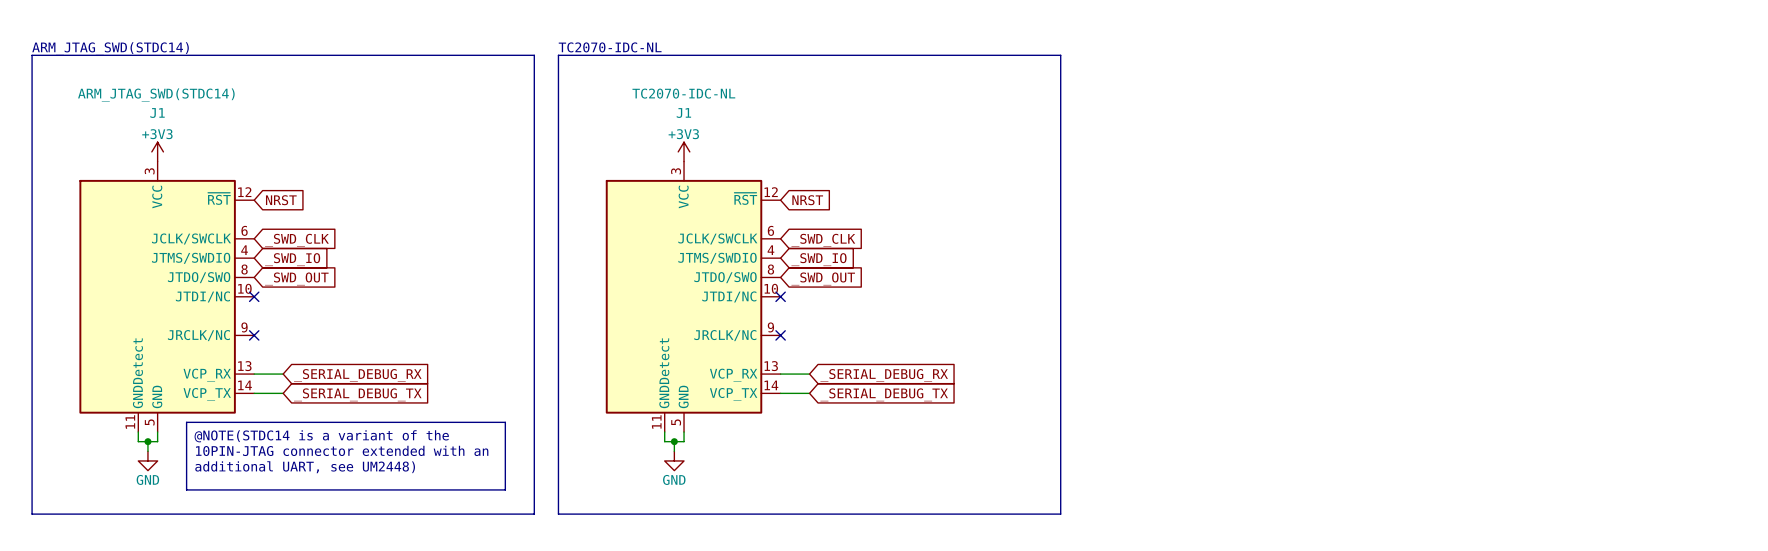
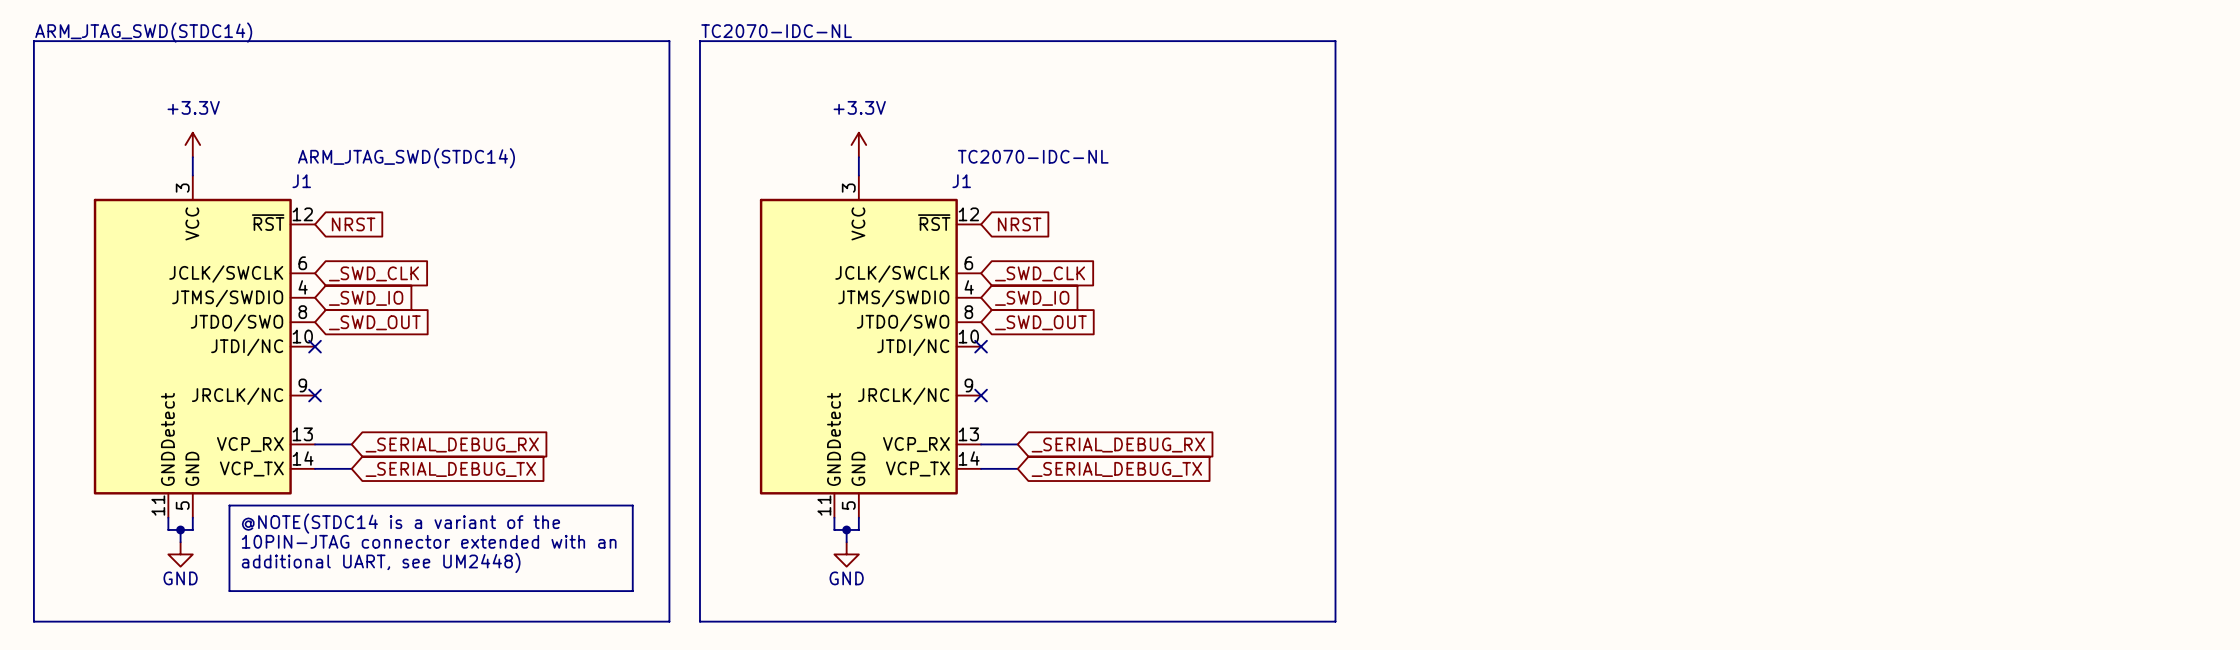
J1 value position: TC2070-IDC-NL (683, 93) -> TC2070-IDC-NL (1033, 156)
J1 value position: ARM_JTAG_SWD(STDC14) (156, 94) -> ARM_JTAG_SWD(STDC14) (406, 158)
J1 name position: J1 (157, 113) -> J1 (301, 181)
J1 name position: J1 (683, 113) -> J1 (961, 181)
power symbol: none -> +3.3V (192, 145)
power symbol: none -> +3.3V (858, 145)
power symbol: +3V3 (157, 151) -> none
power symbol: +3V3 (684, 151) -> none

